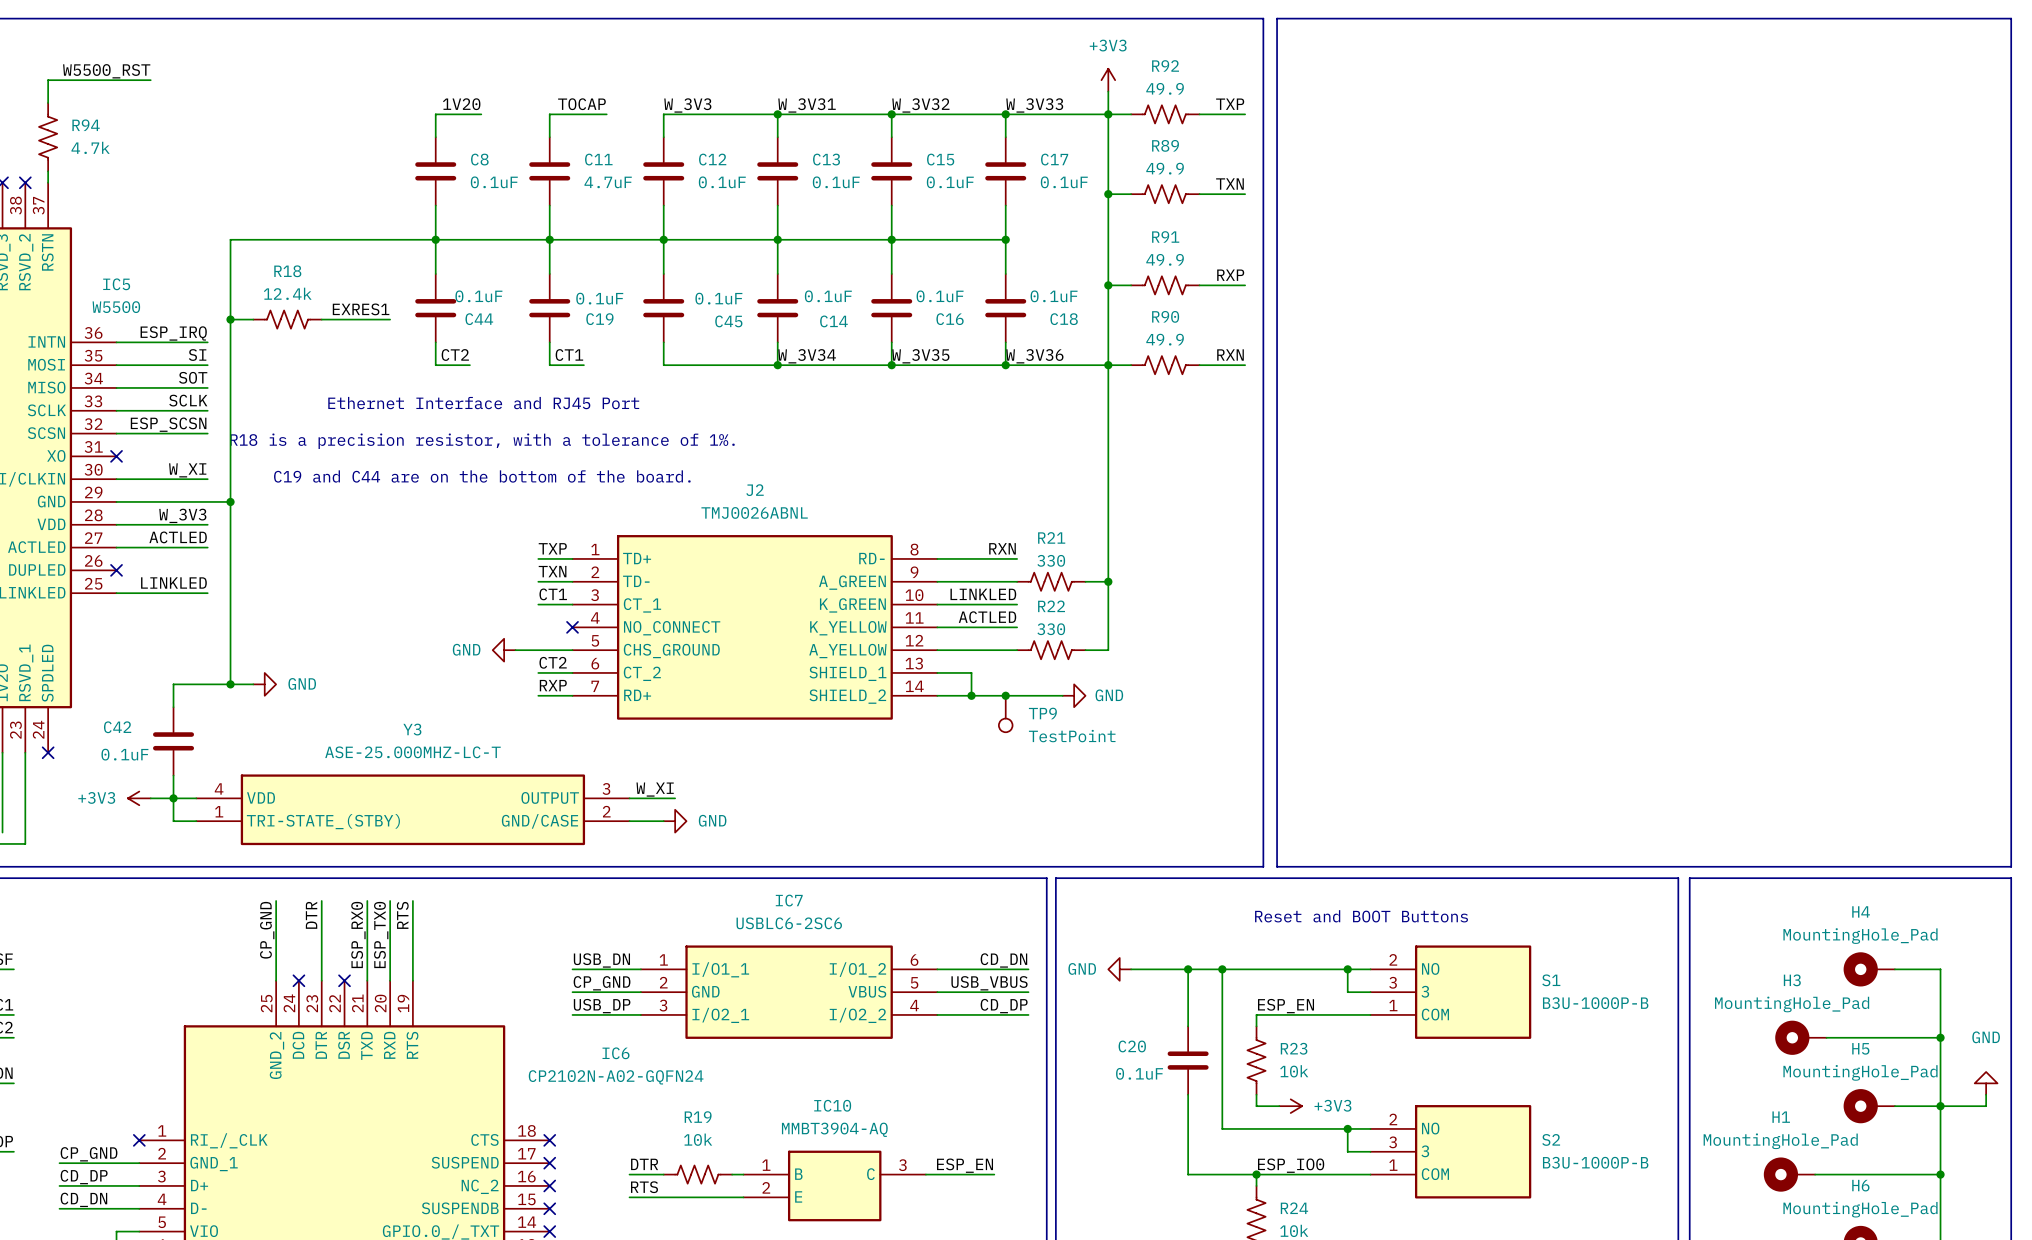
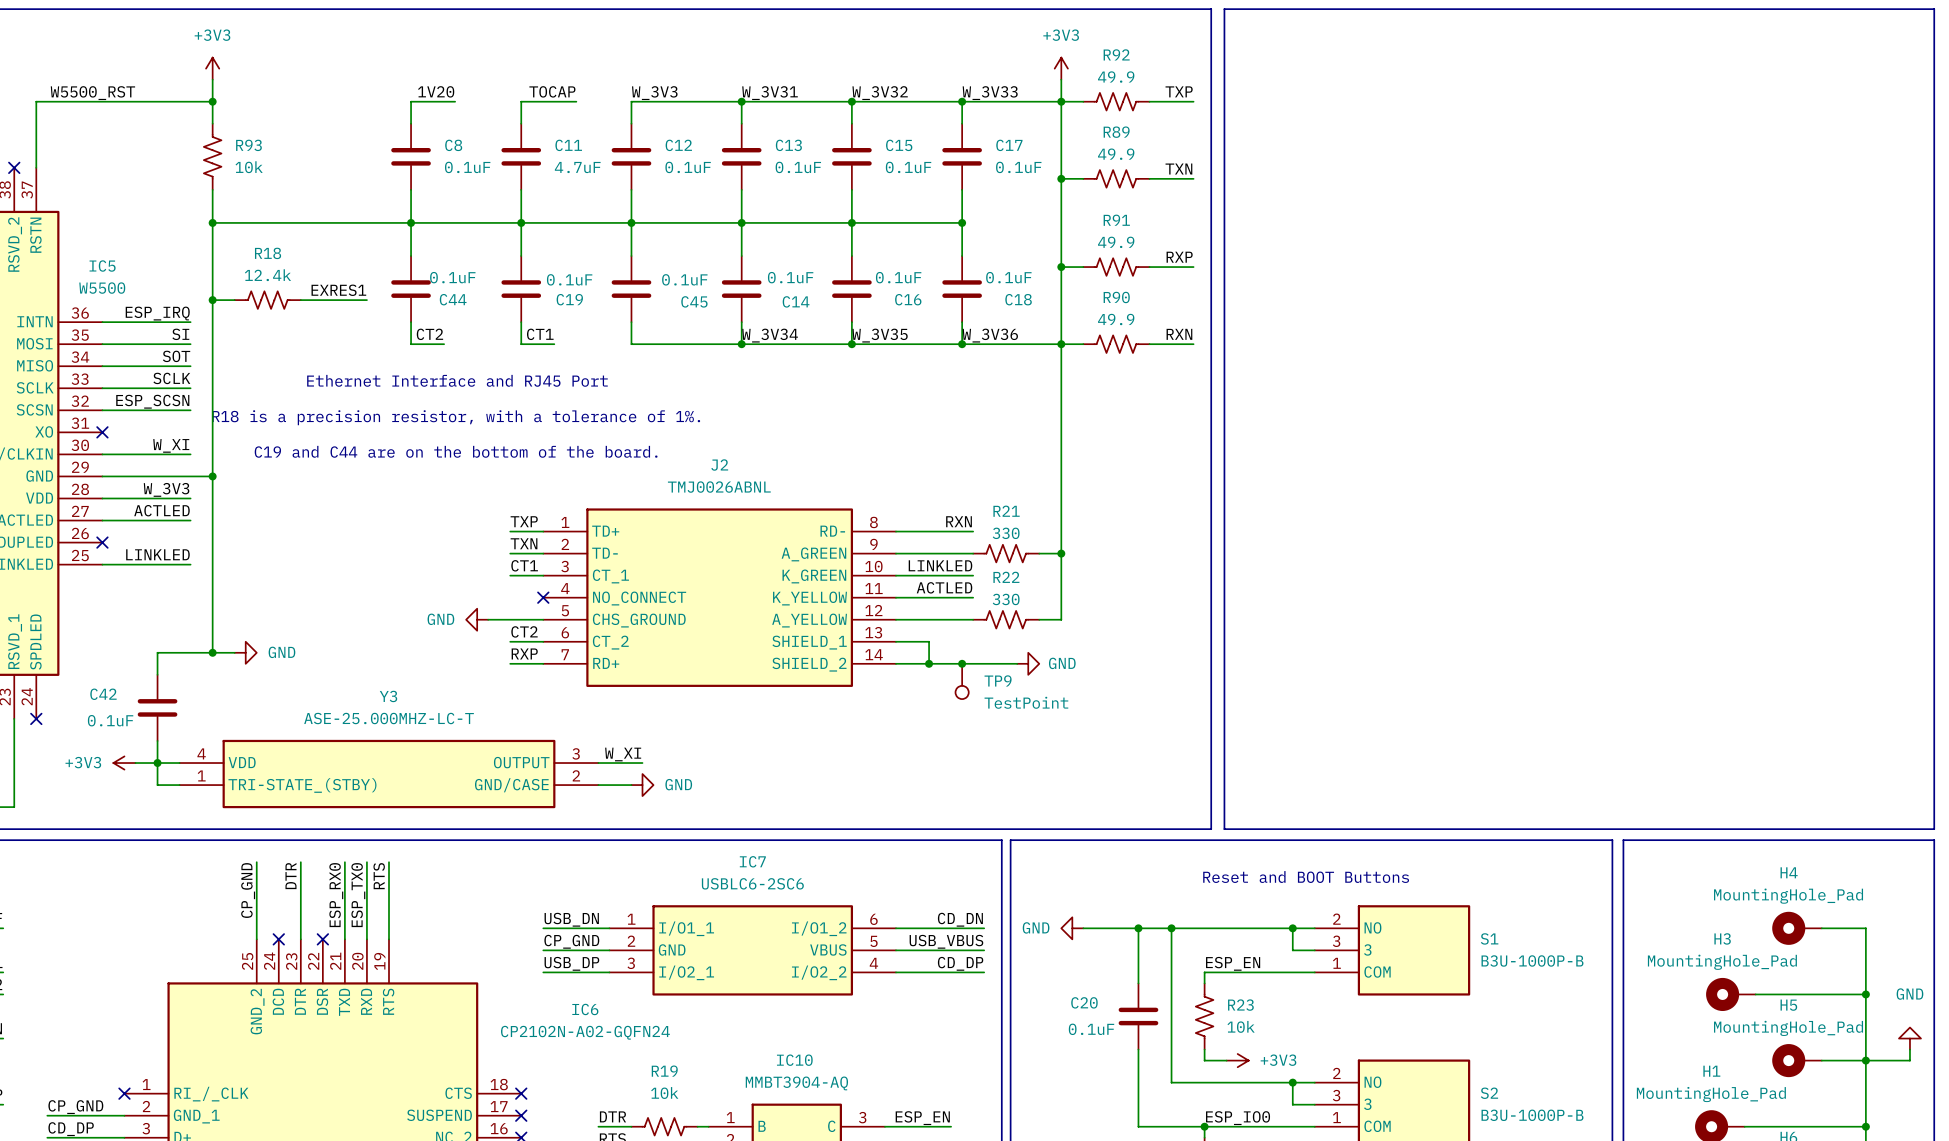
label position: W5500_RST (106, 71) -> W5500_RST (92, 93)
wire: (150, 80) (48, 80) (48, 102) -> none
power symbol: none -> +3V3 (212, 68)
wire: none -> (212, 79) (212, 123)
wire: none -> (212, 101) (36, 101) (36, 156)
junction: none -> (212, 101)
R94: 4.7k (48, 137) -> none
R93: none -> 10k (212, 156)
wire: none -> (212, 189) (212, 222)
junction: none -> (212, 222)

